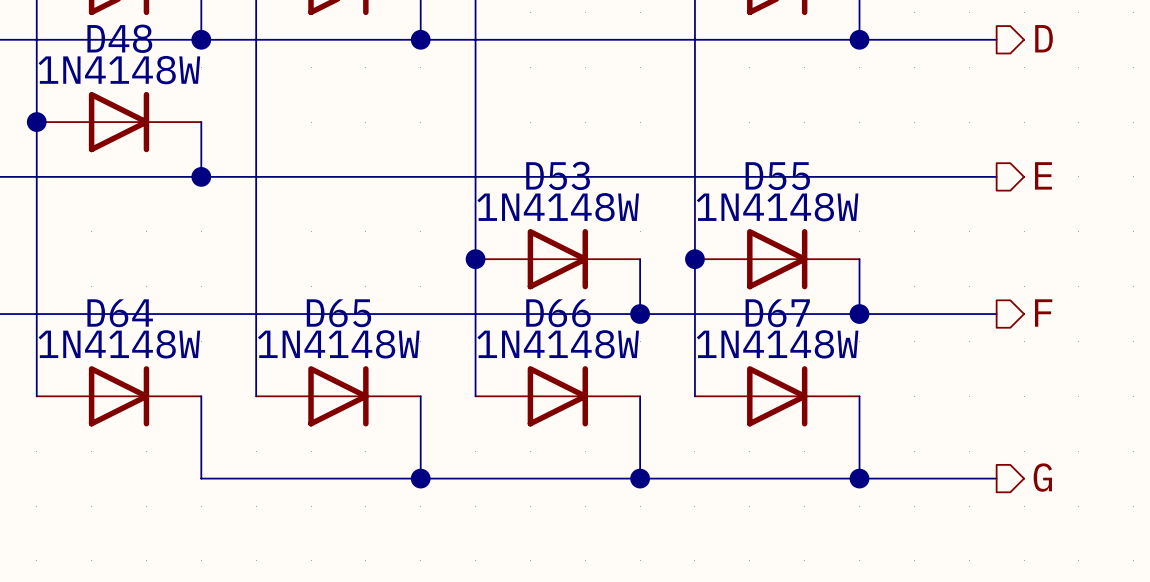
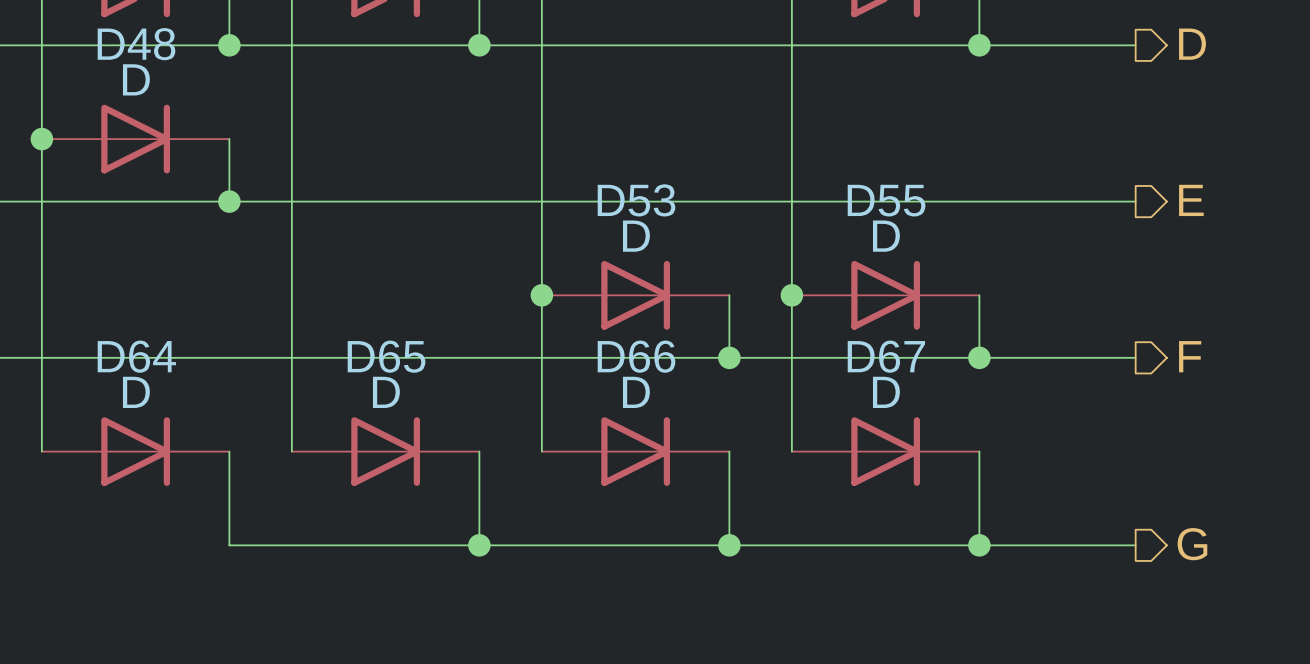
D48 value: 1N4148W (119, 70) -> D (136, 79)
D53 value: 1N4148W (558, 207) -> D (636, 236)
D55 value: 1N4148W (777, 207) -> D (886, 236)
D64 value: 1N4148W (119, 344) -> D (136, 392)
D65 value: 1N4148W (338, 344) -> D (386, 392)
D66 value: 1N4148W (558, 344) -> D (636, 392)
D67 value: 1N4148W (777, 344) -> D (886, 392)

